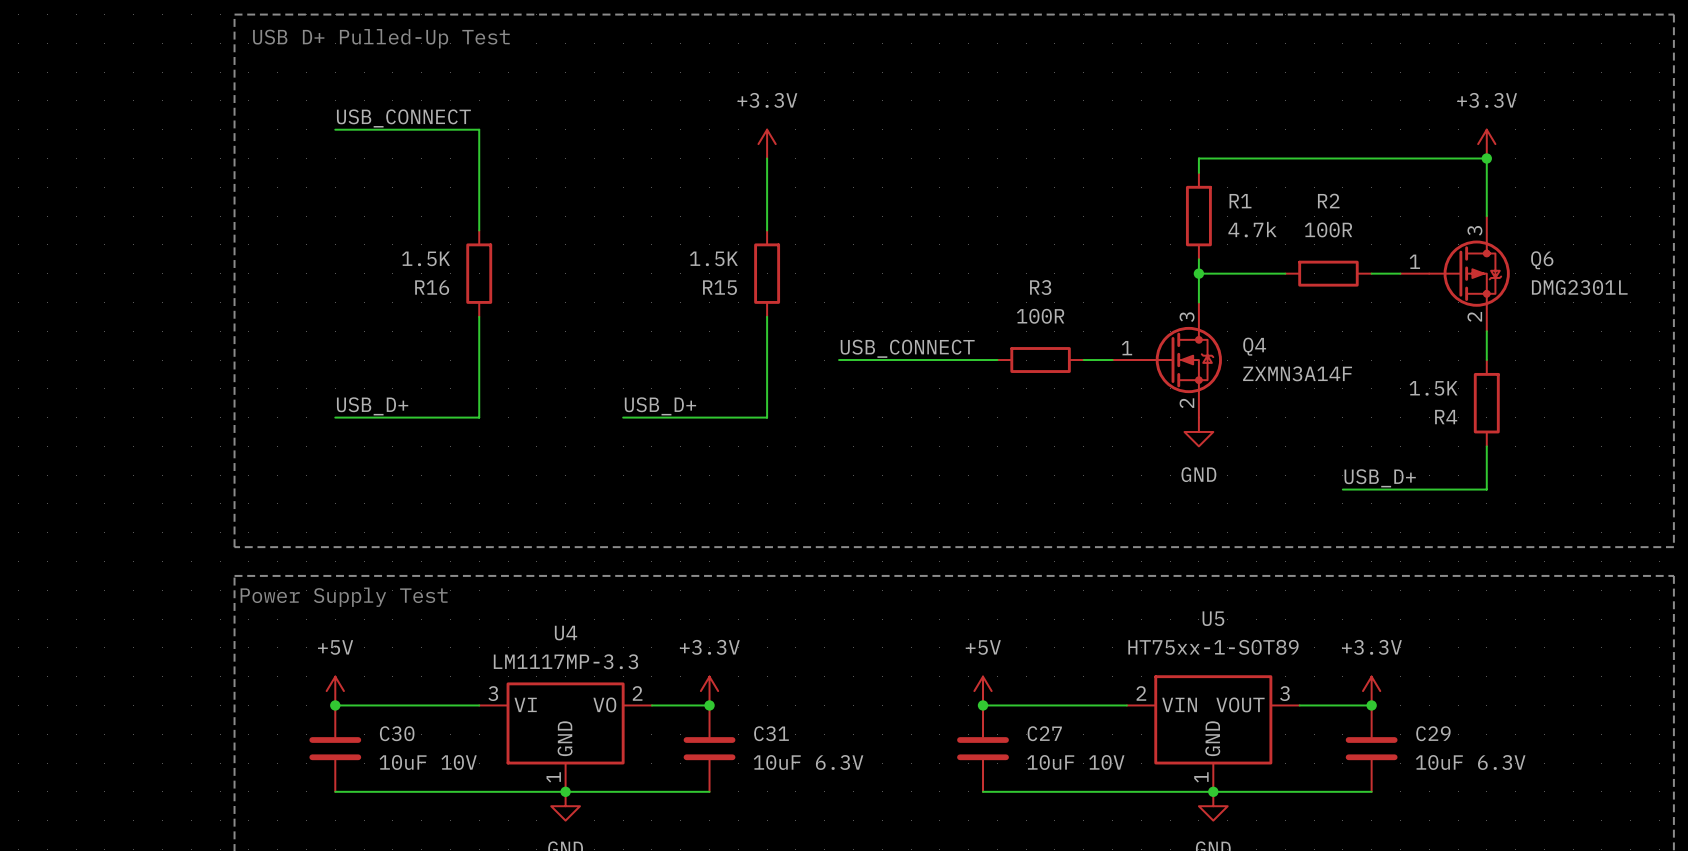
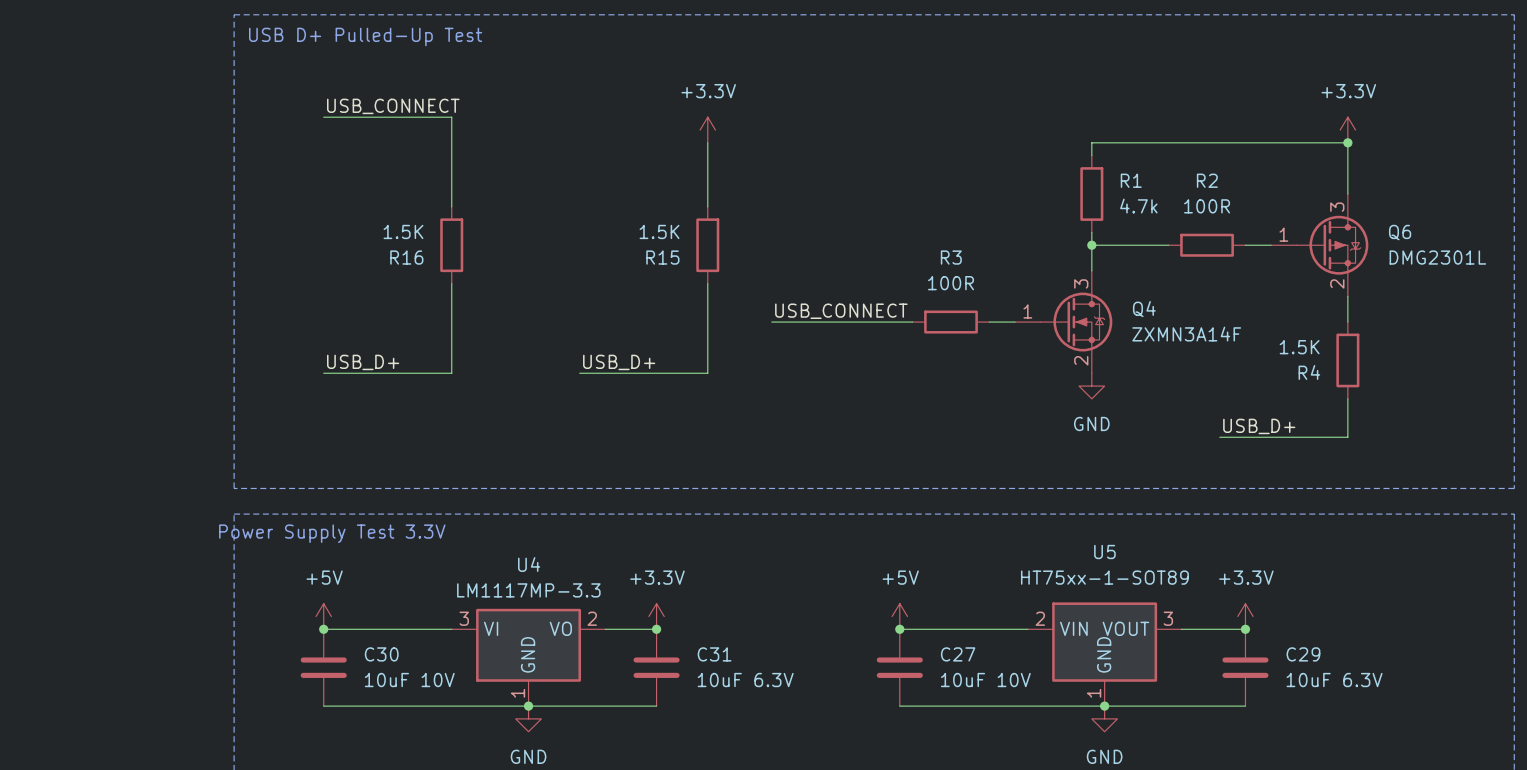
text: Power Supply Test (344, 597) -> Power Supply Test 3.3V (332, 533)

